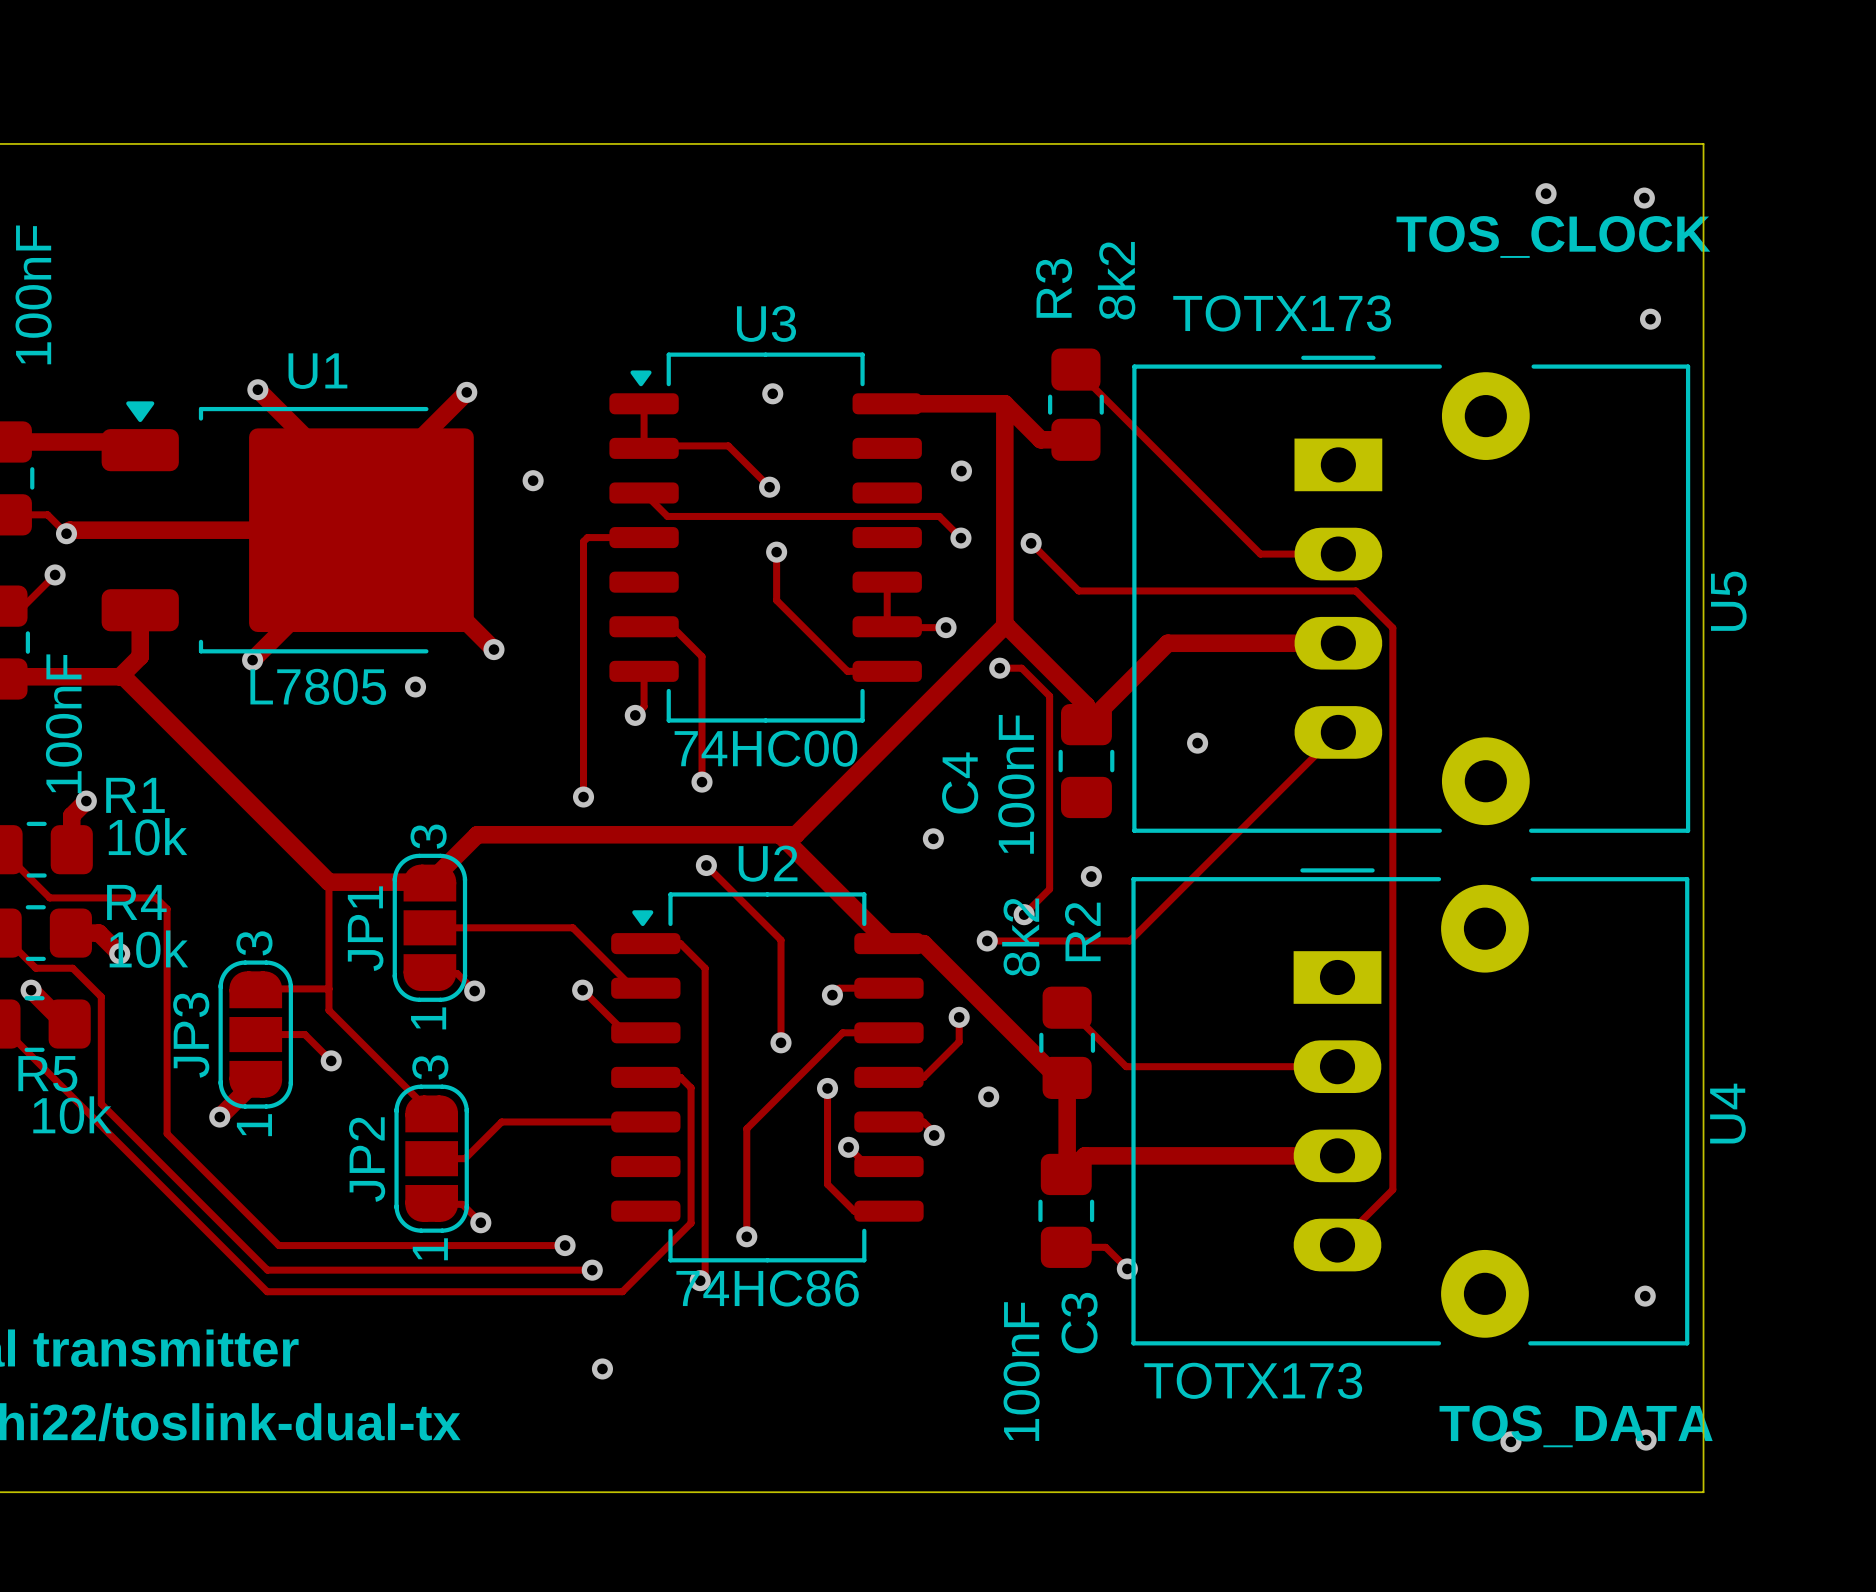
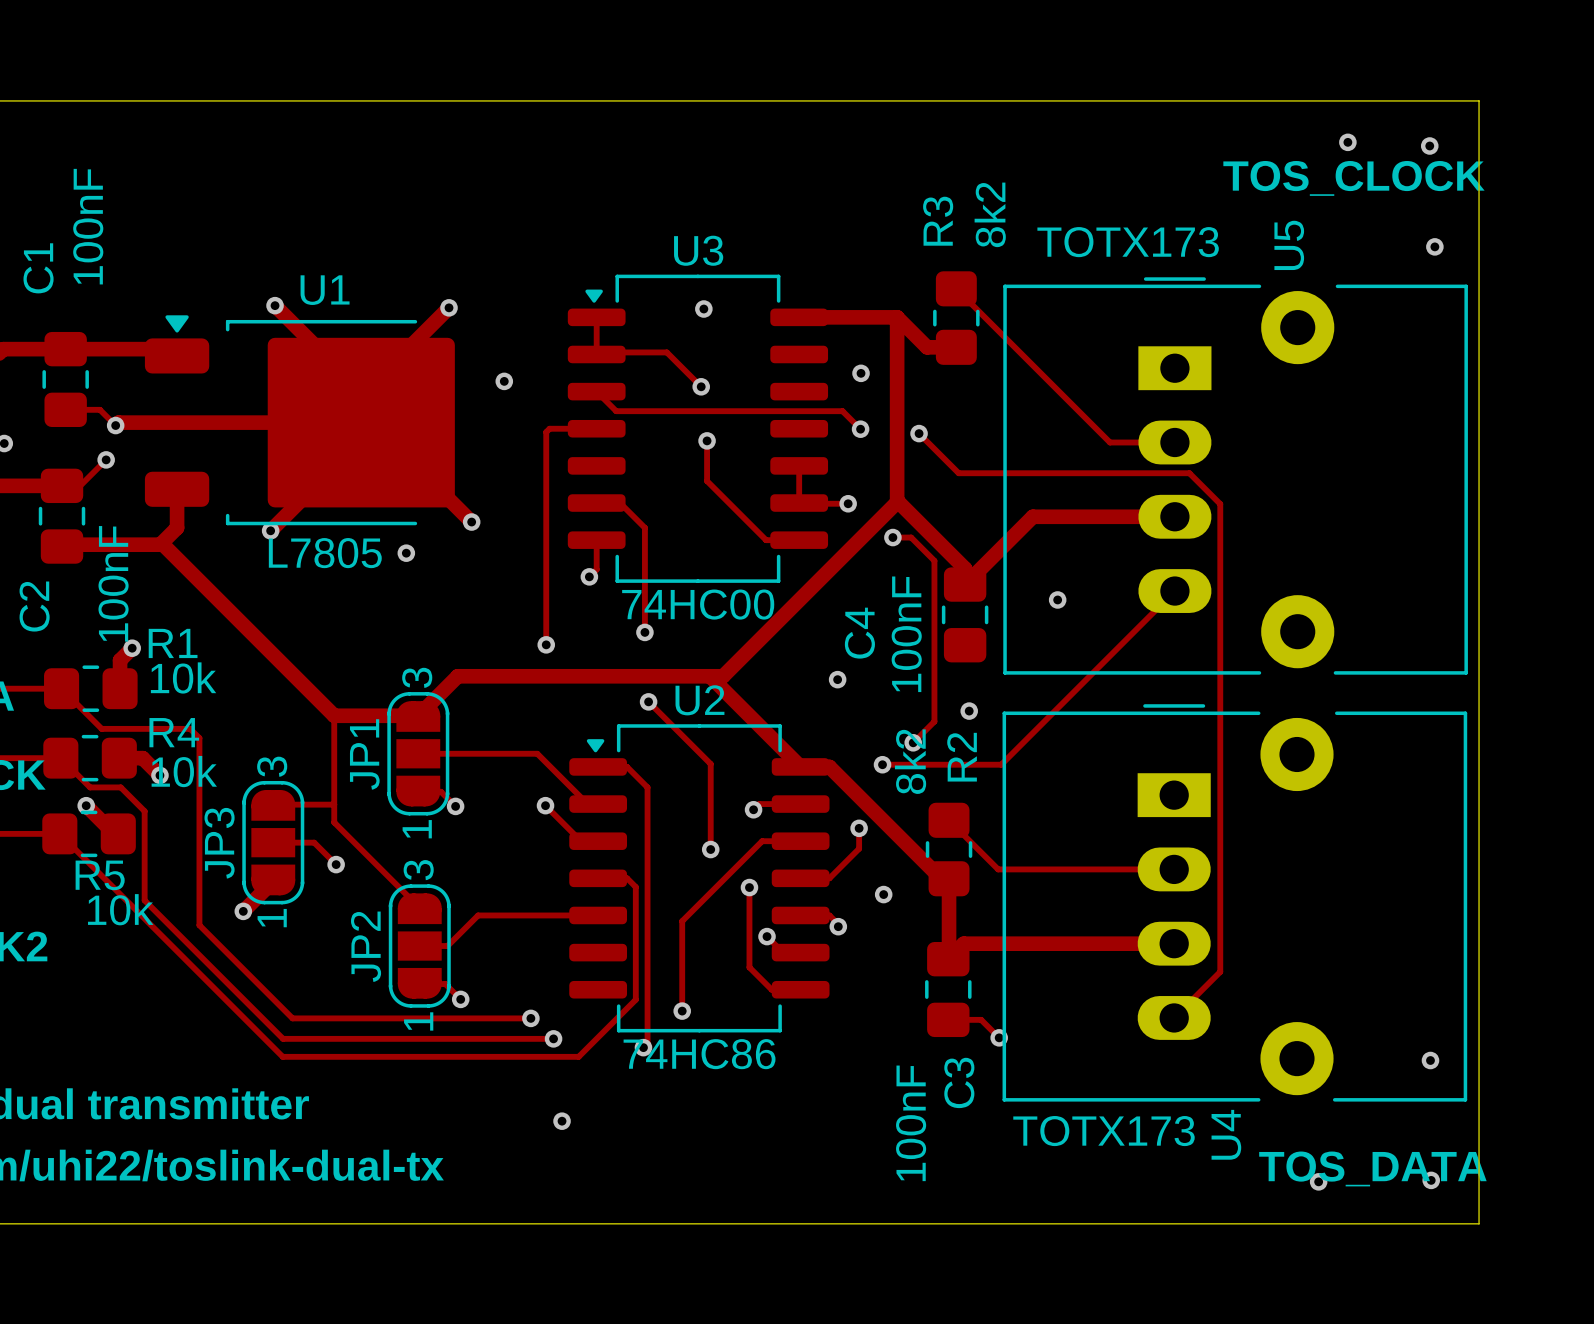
U5 name position: U5 (1728, 601) -> U5 (1289, 245)
U4 name position: U4 (1727, 1113) -> U4 (1226, 1134)

